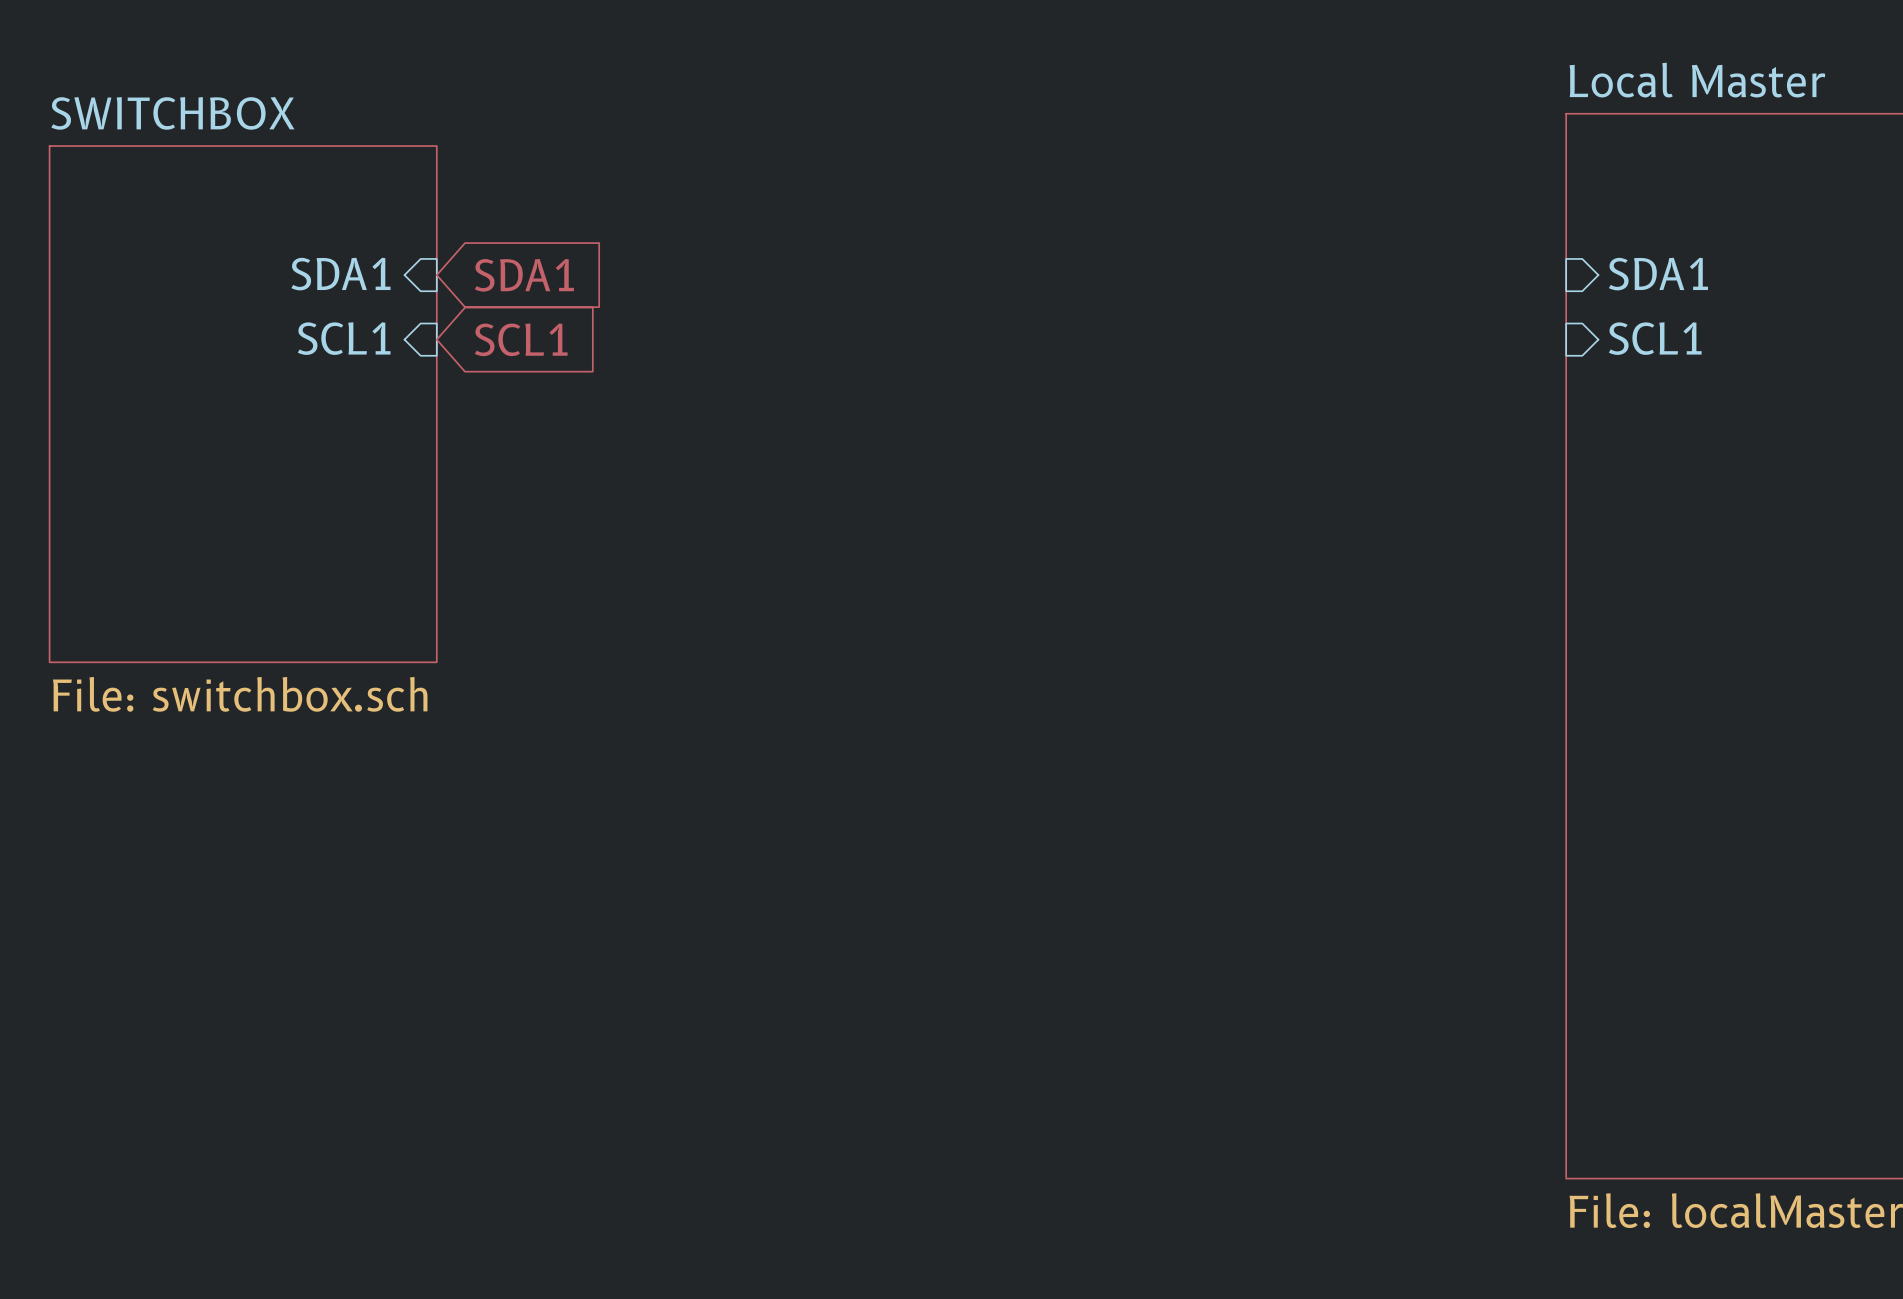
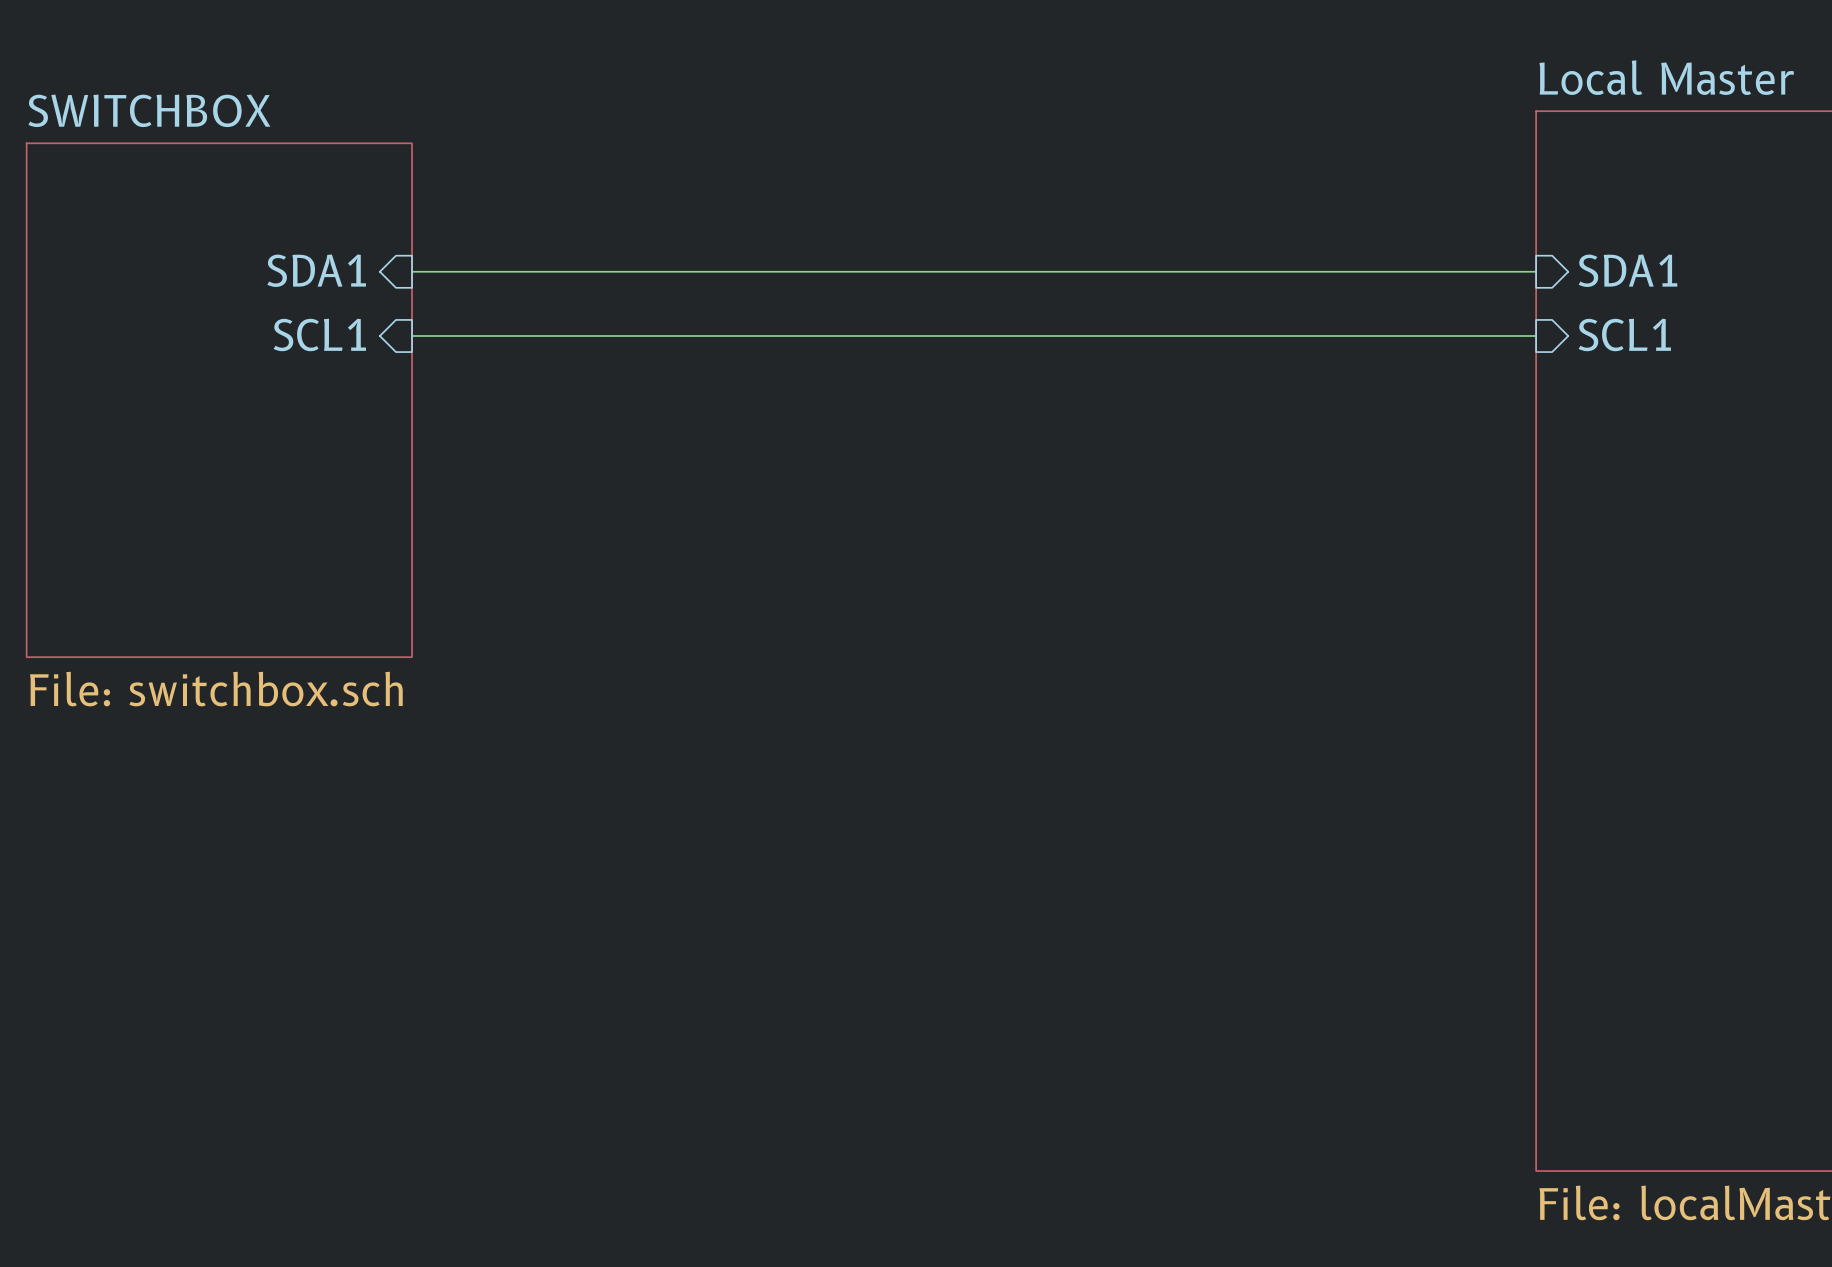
wire: none -> (412, 271) (1536, 271)
global label: SDA1 (524, 275) -> none
wire: none -> (412, 336) (1536, 336)
global label: SCL1 (521, 339) -> none

